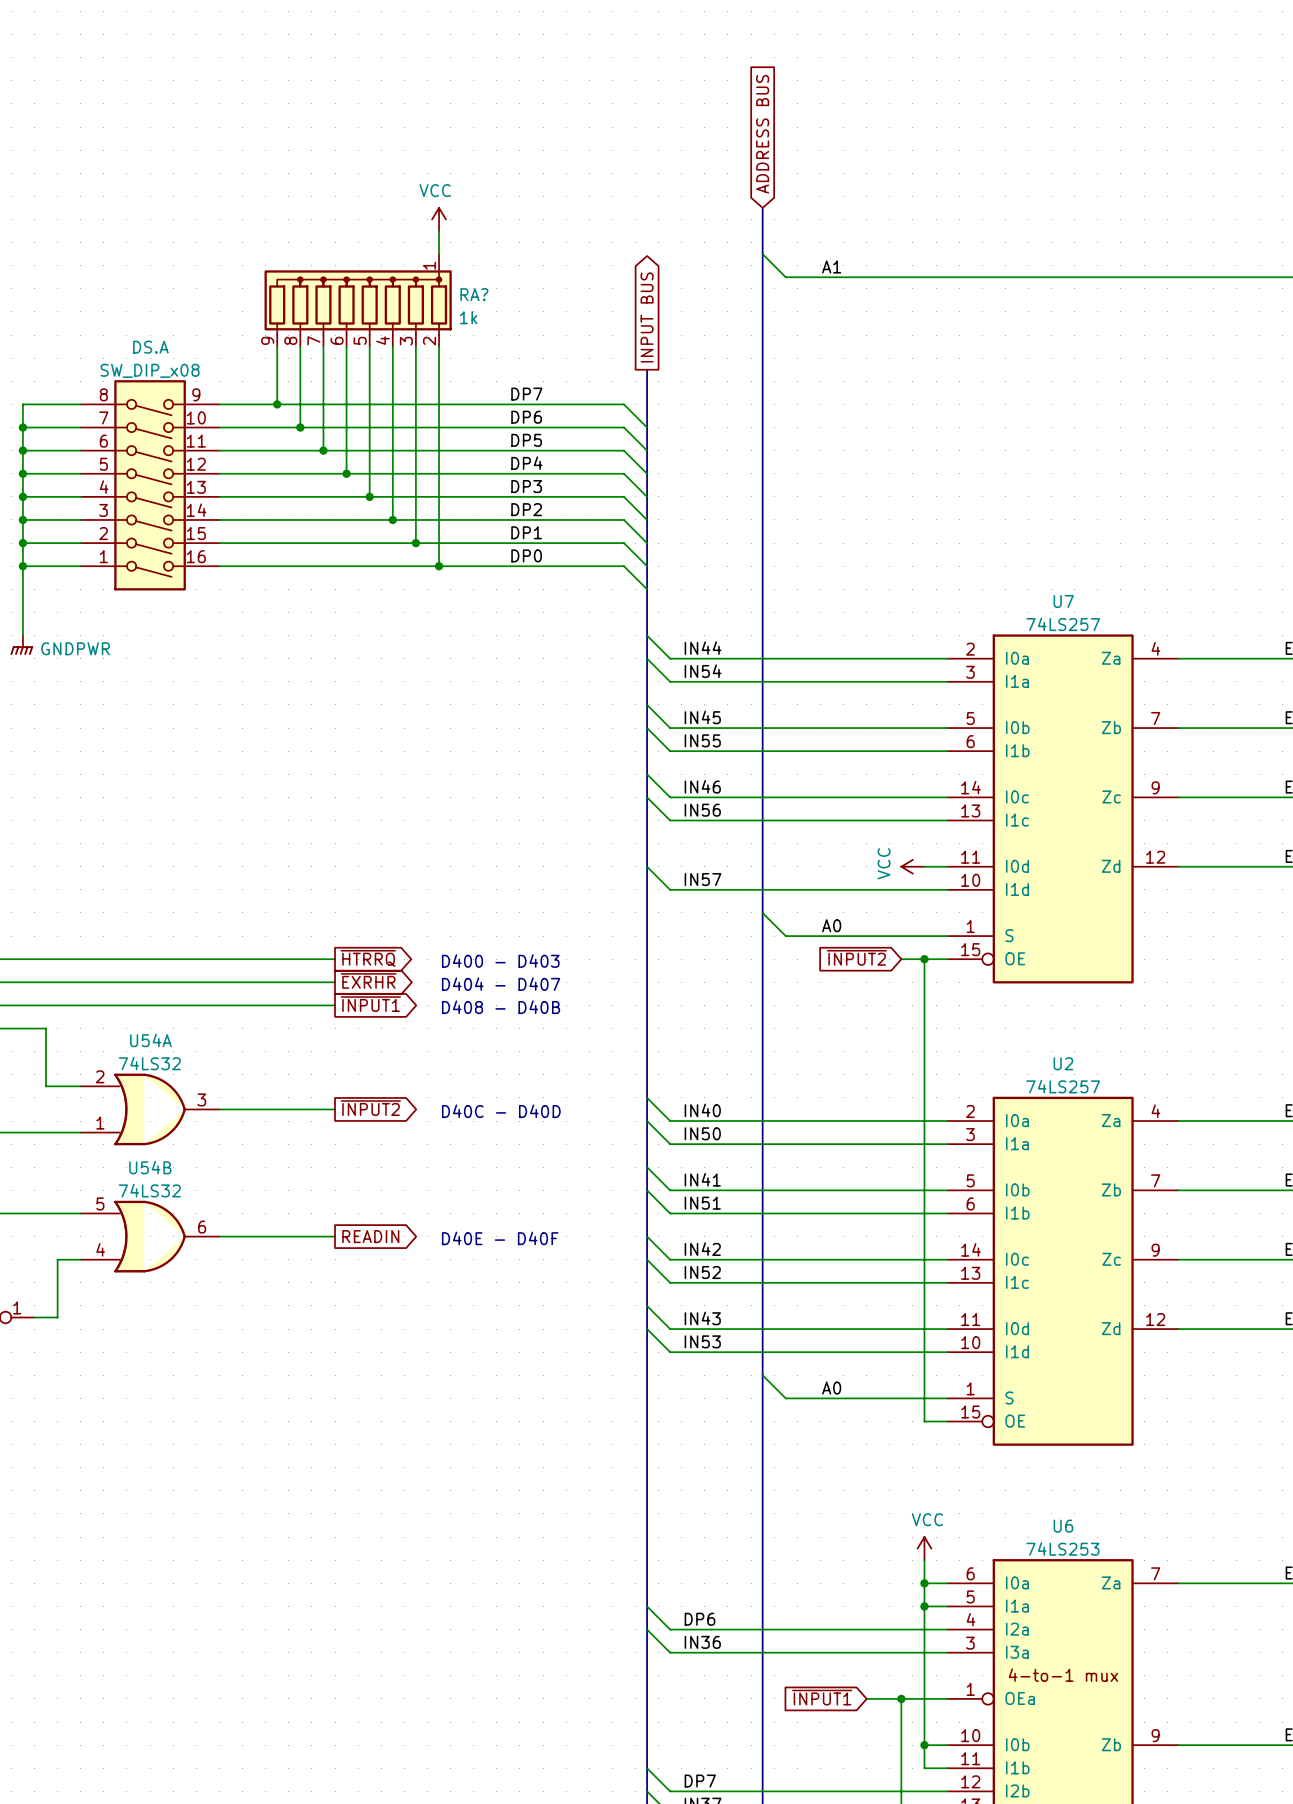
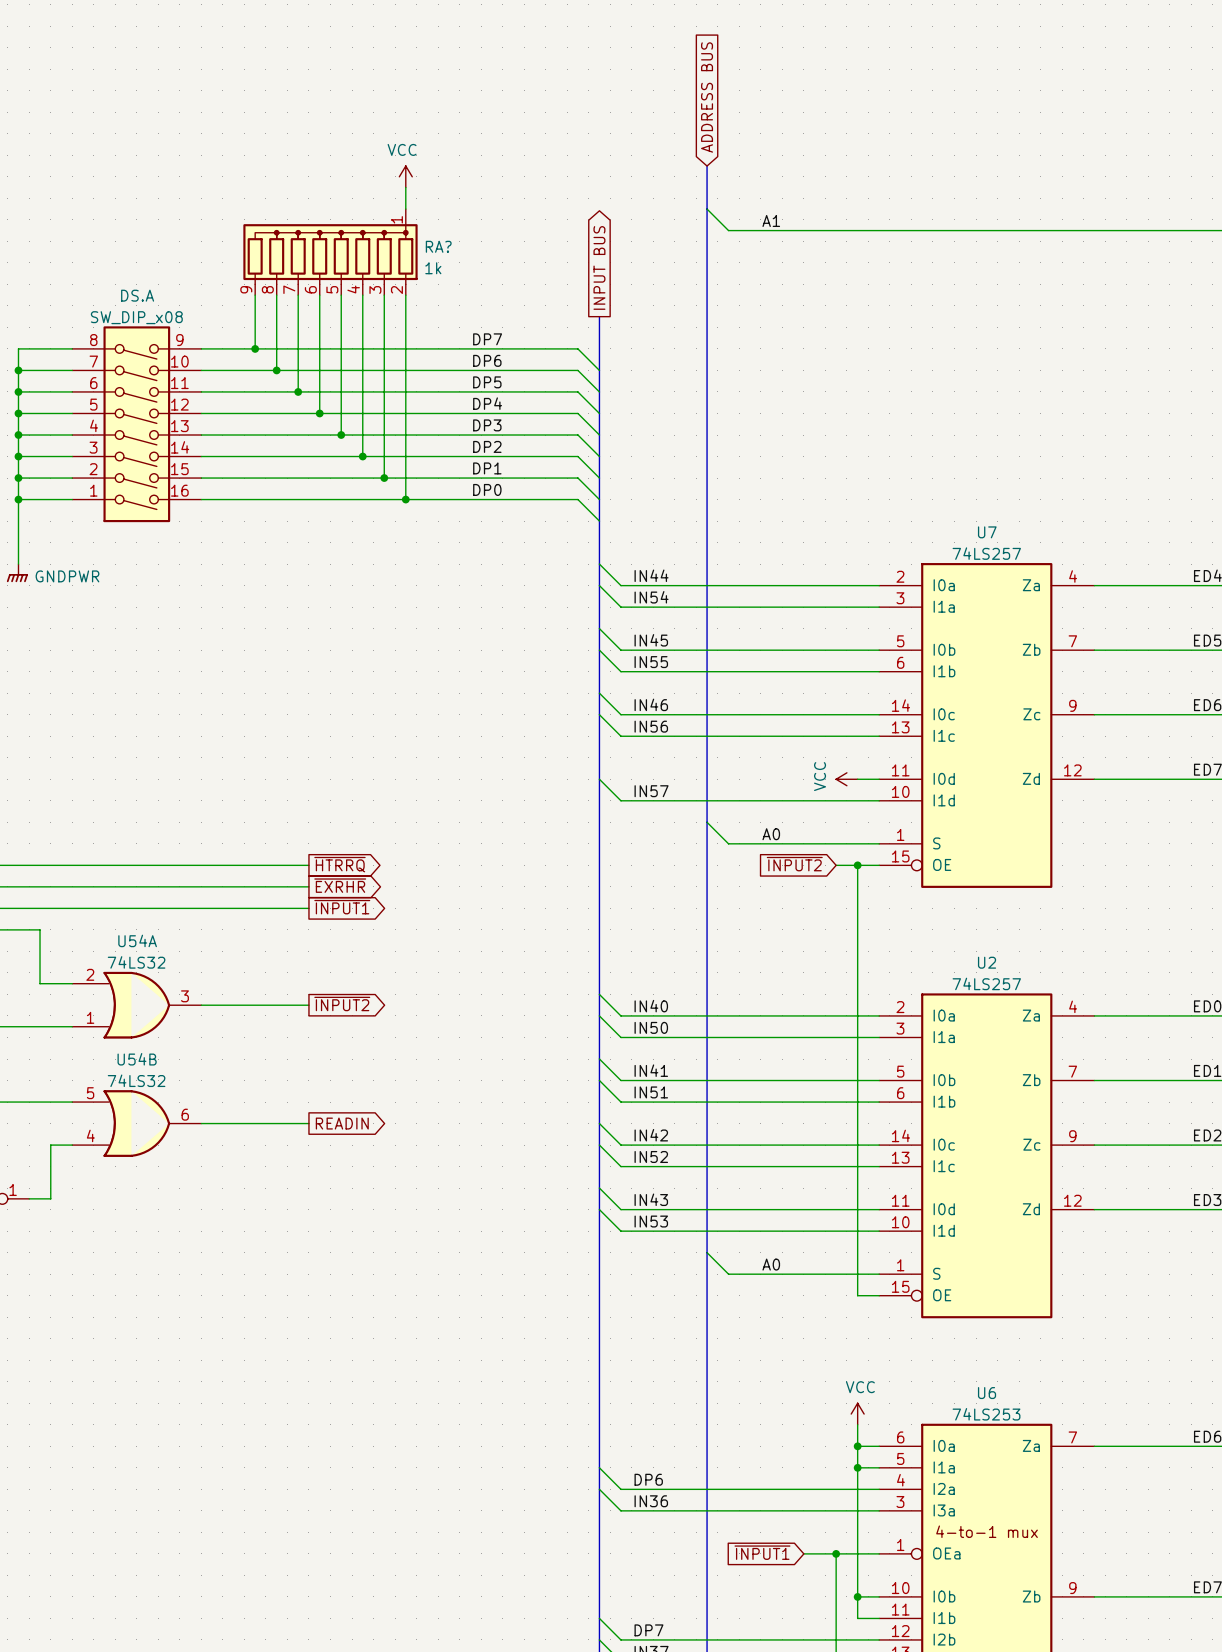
text: D400 - D403 (500, 961) -> none
text: D404 - D407 (501, 984) -> none
text: D408 - D40B (501, 1007) -> none
text: D40C - D40D (501, 1111) -> none
text: D40E - D40F (500, 1238) -> none

